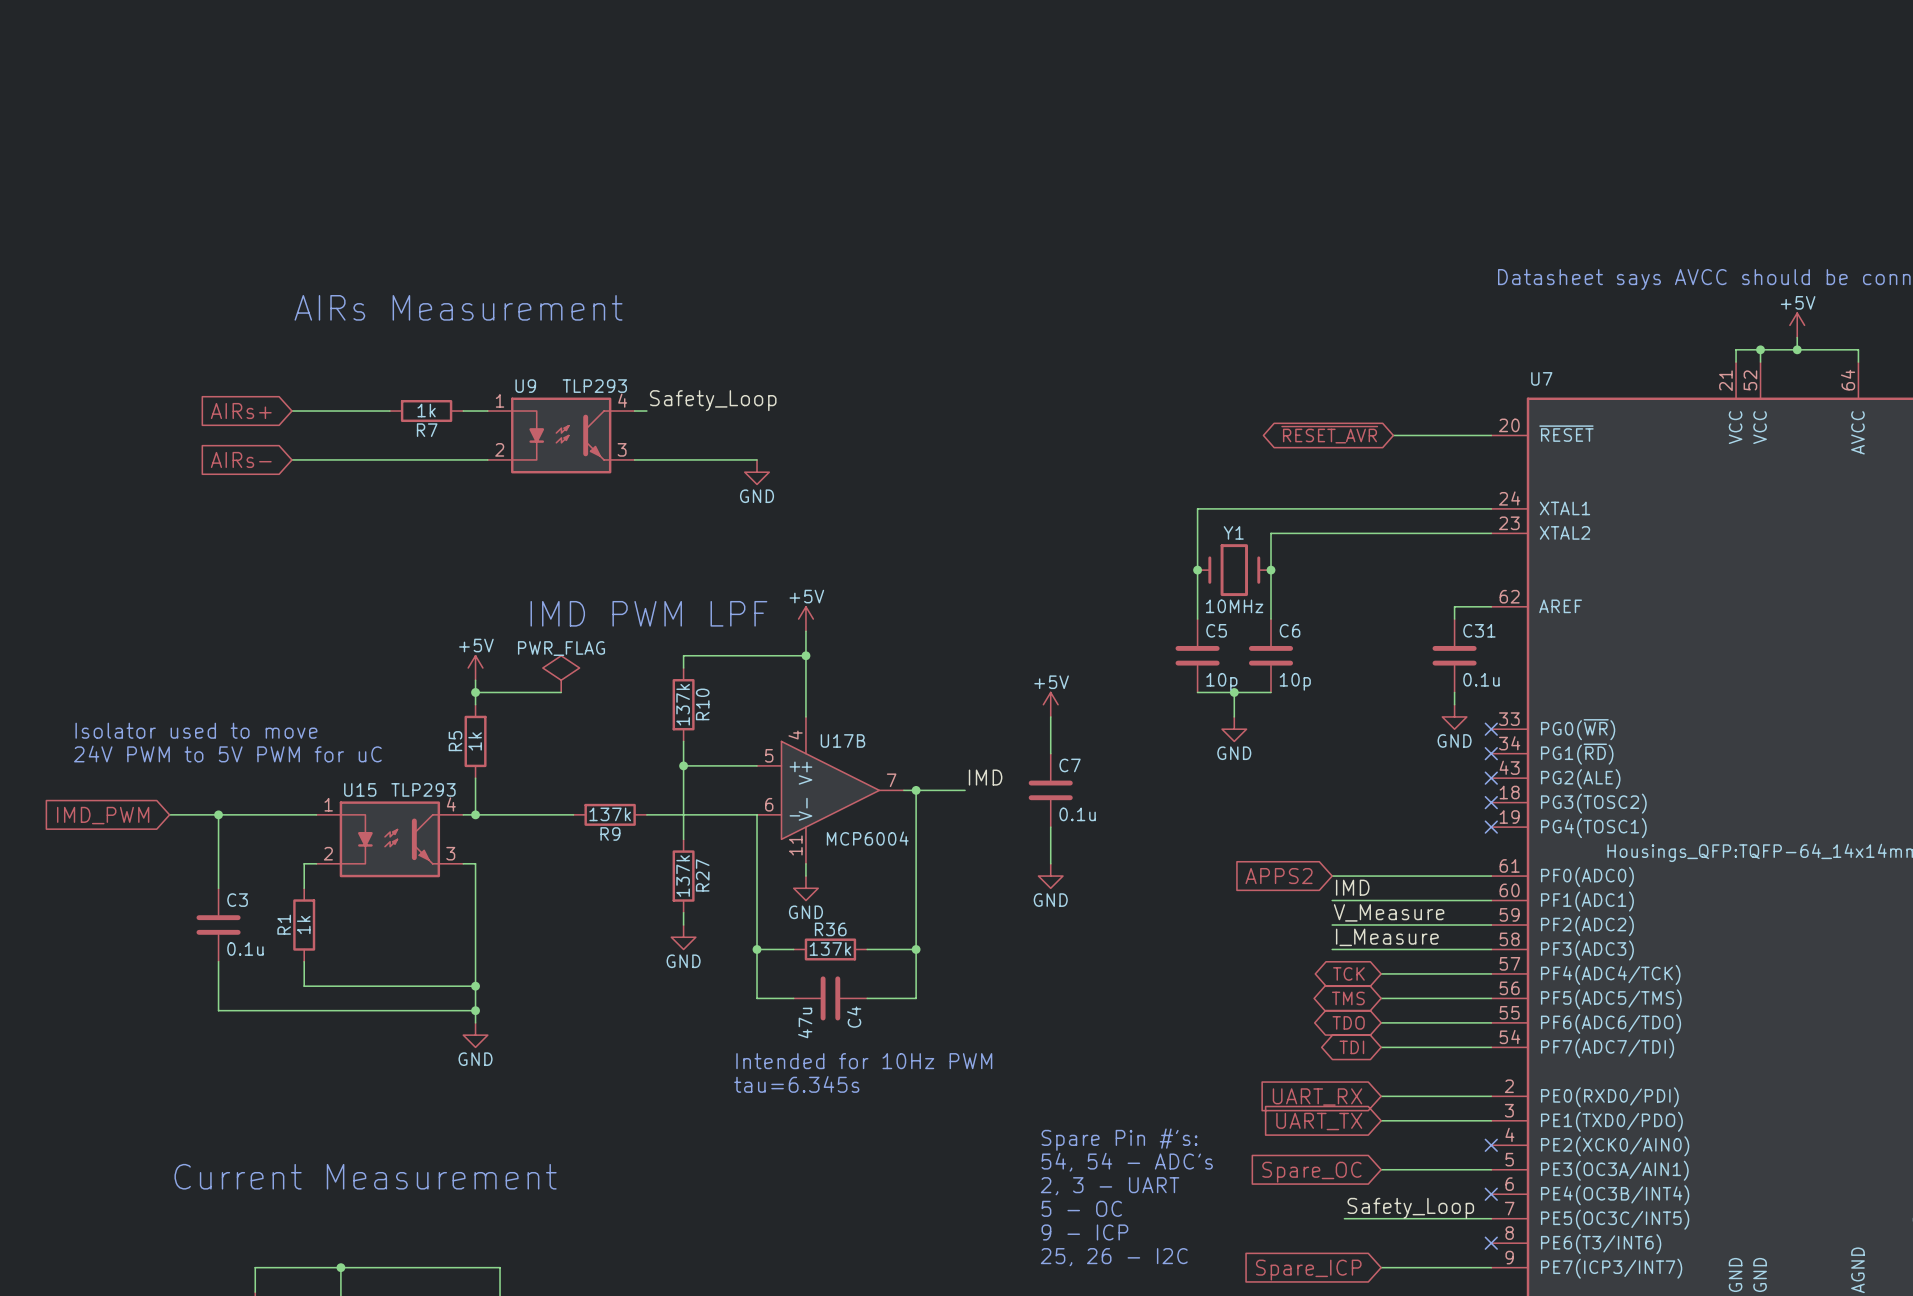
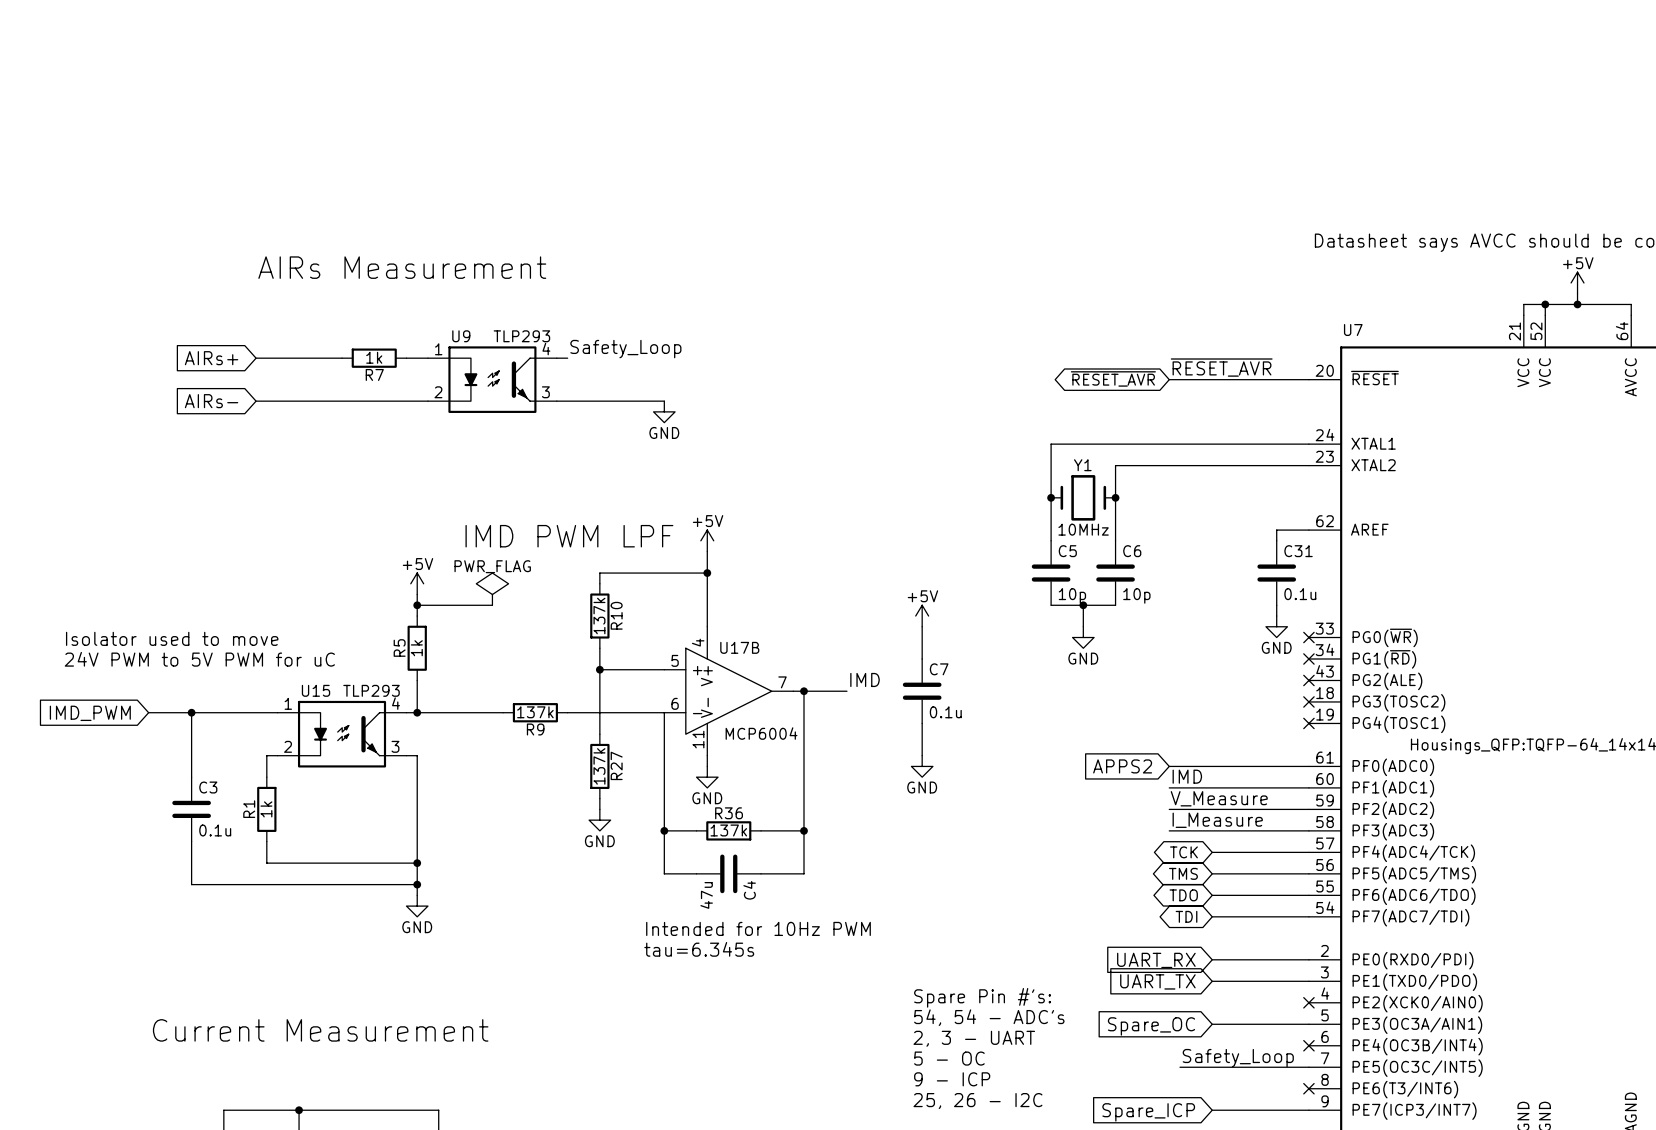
label: none -> ~{RESET_AVR} (1221, 367)
global label position: ~{RESET_AVR} (1329, 434) -> ~{RESET_AVR} (1113, 378)
wire: none -> (1169, 379) (1222, 379)

